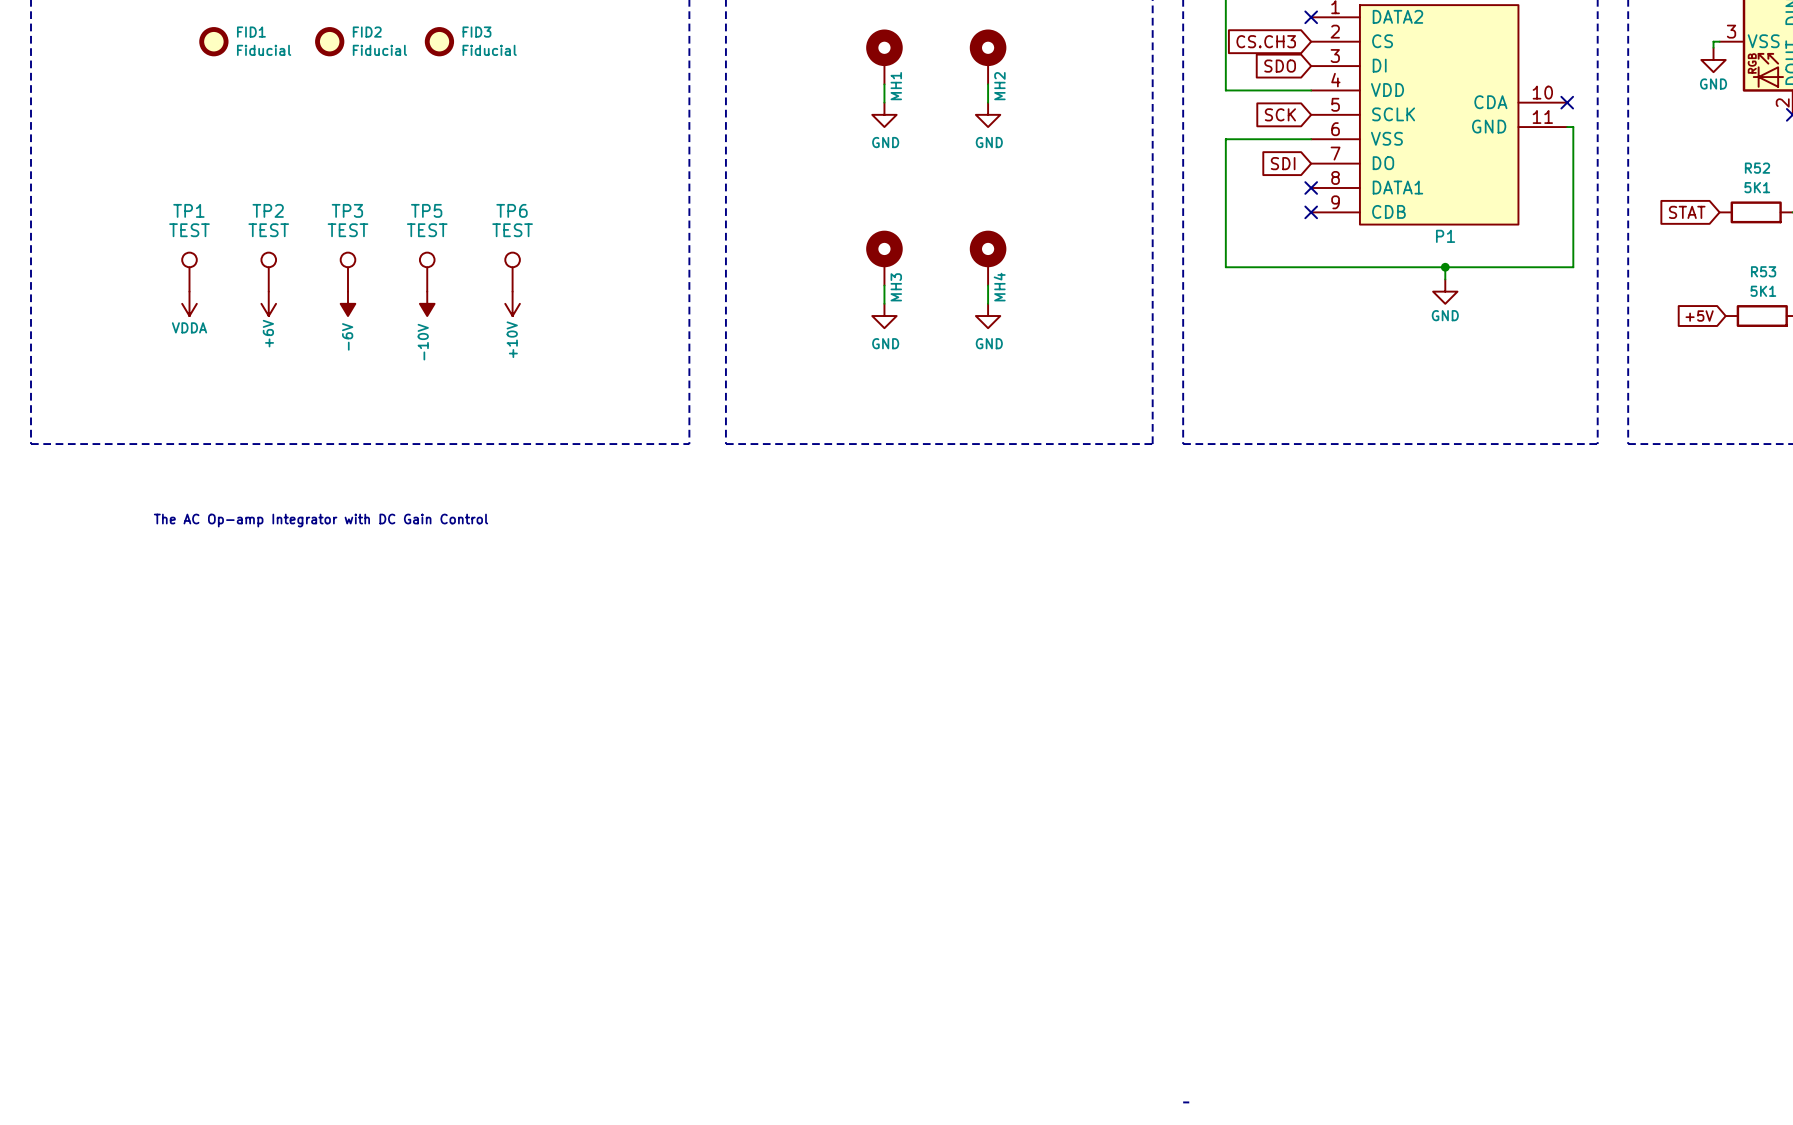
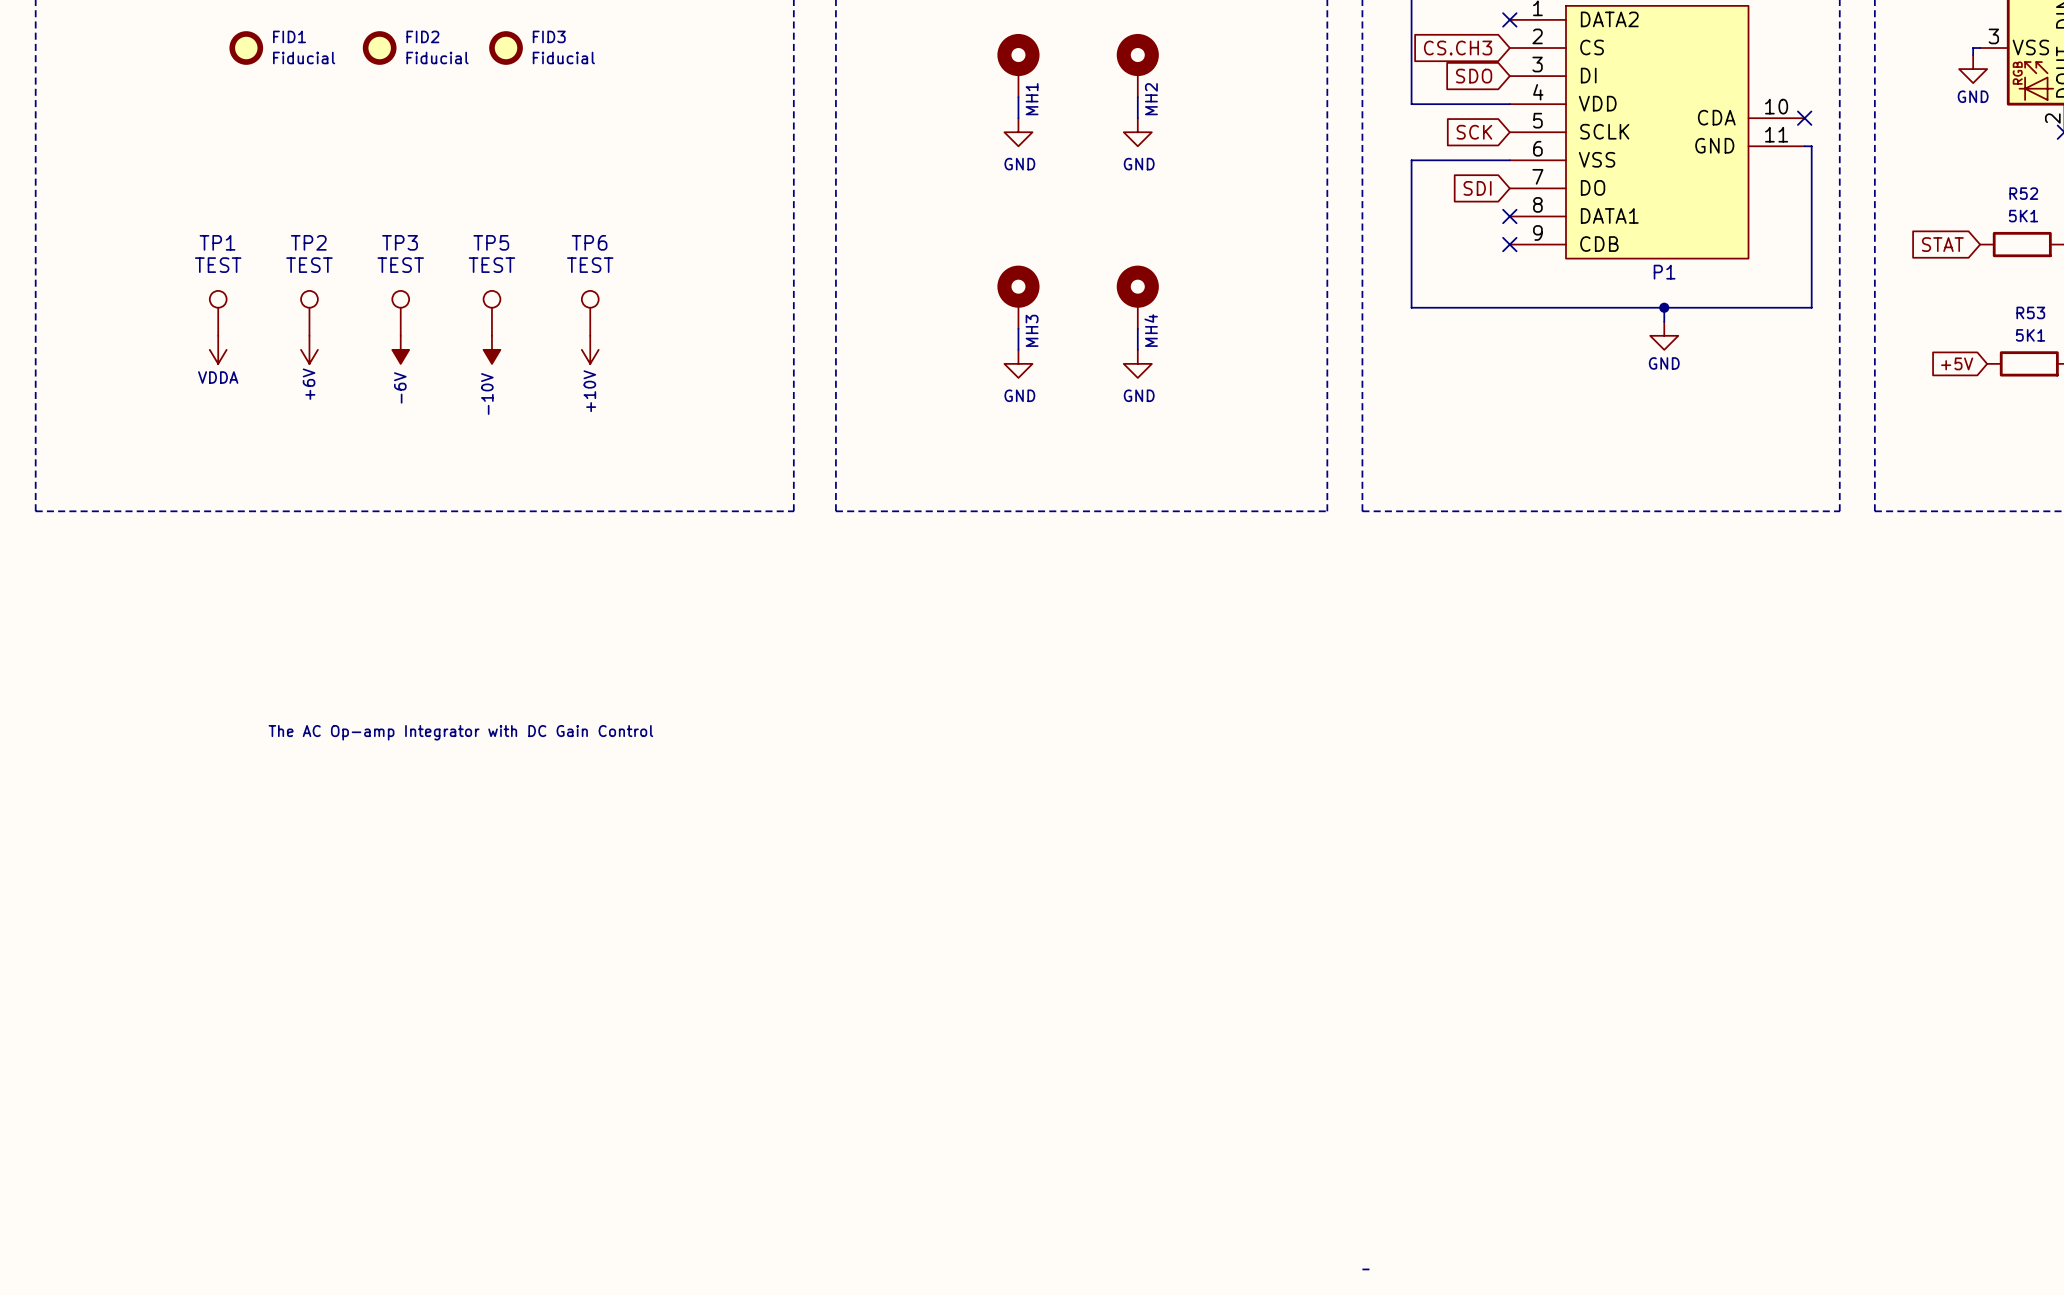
text position: The AC Op-amp Integrator with DC Gain Control (321, 520) -> The AC Op-amp Integrator with DC Gain Control (460, 732)

